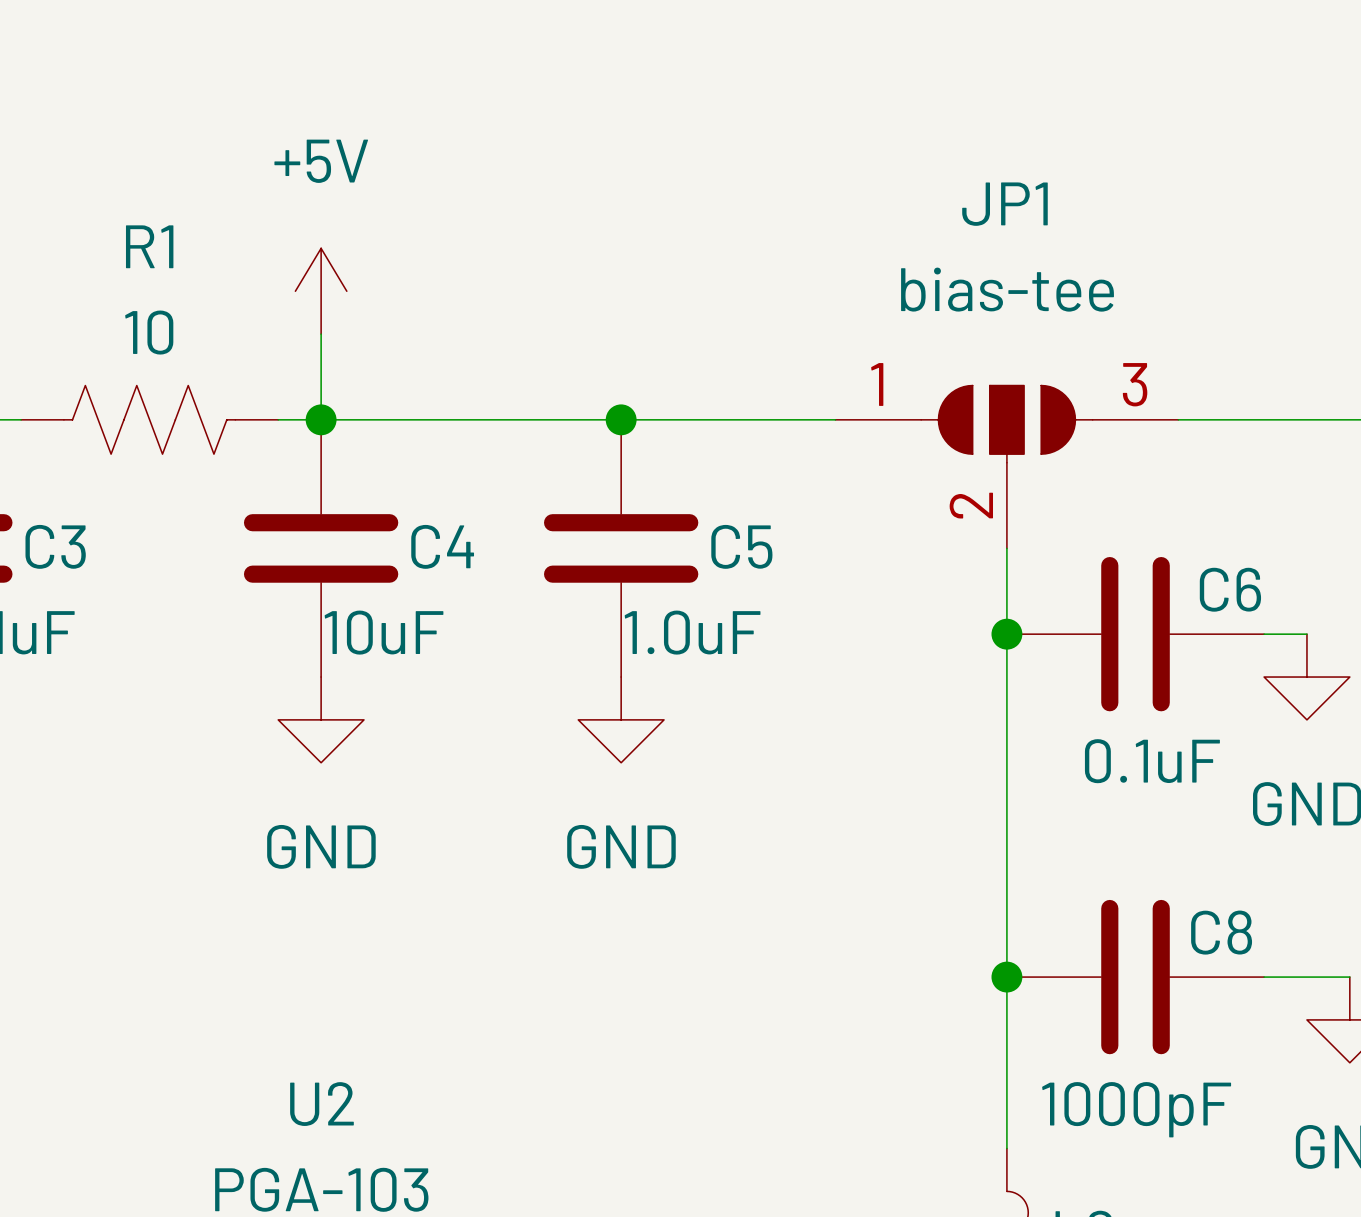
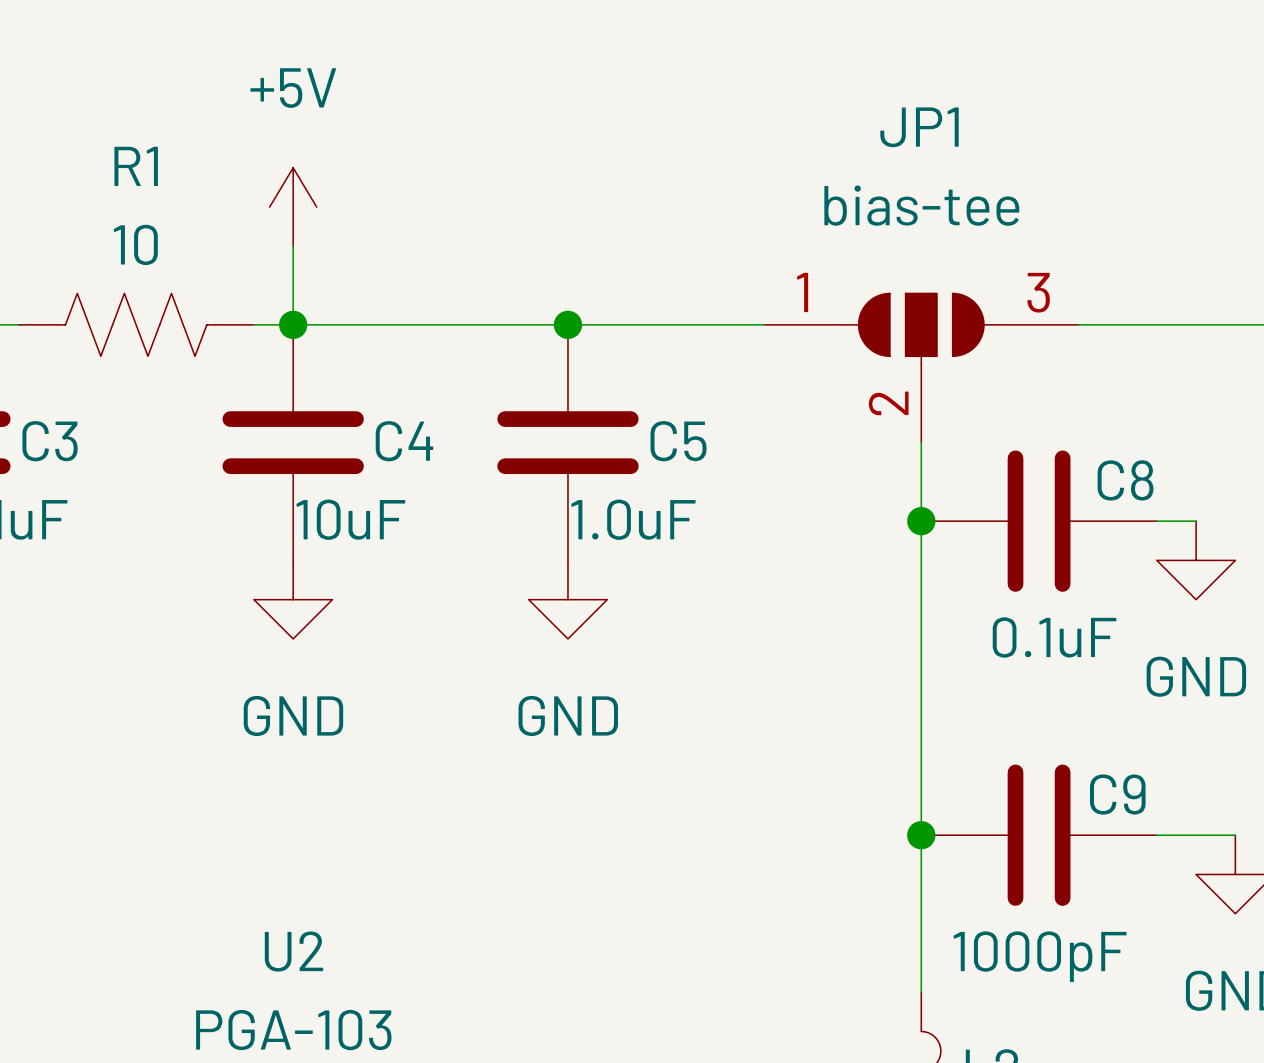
C6 name: C6 (1230, 589) -> C8 (1125, 480)
C8 name: C8 (1221, 932) -> C9 (1117, 794)

